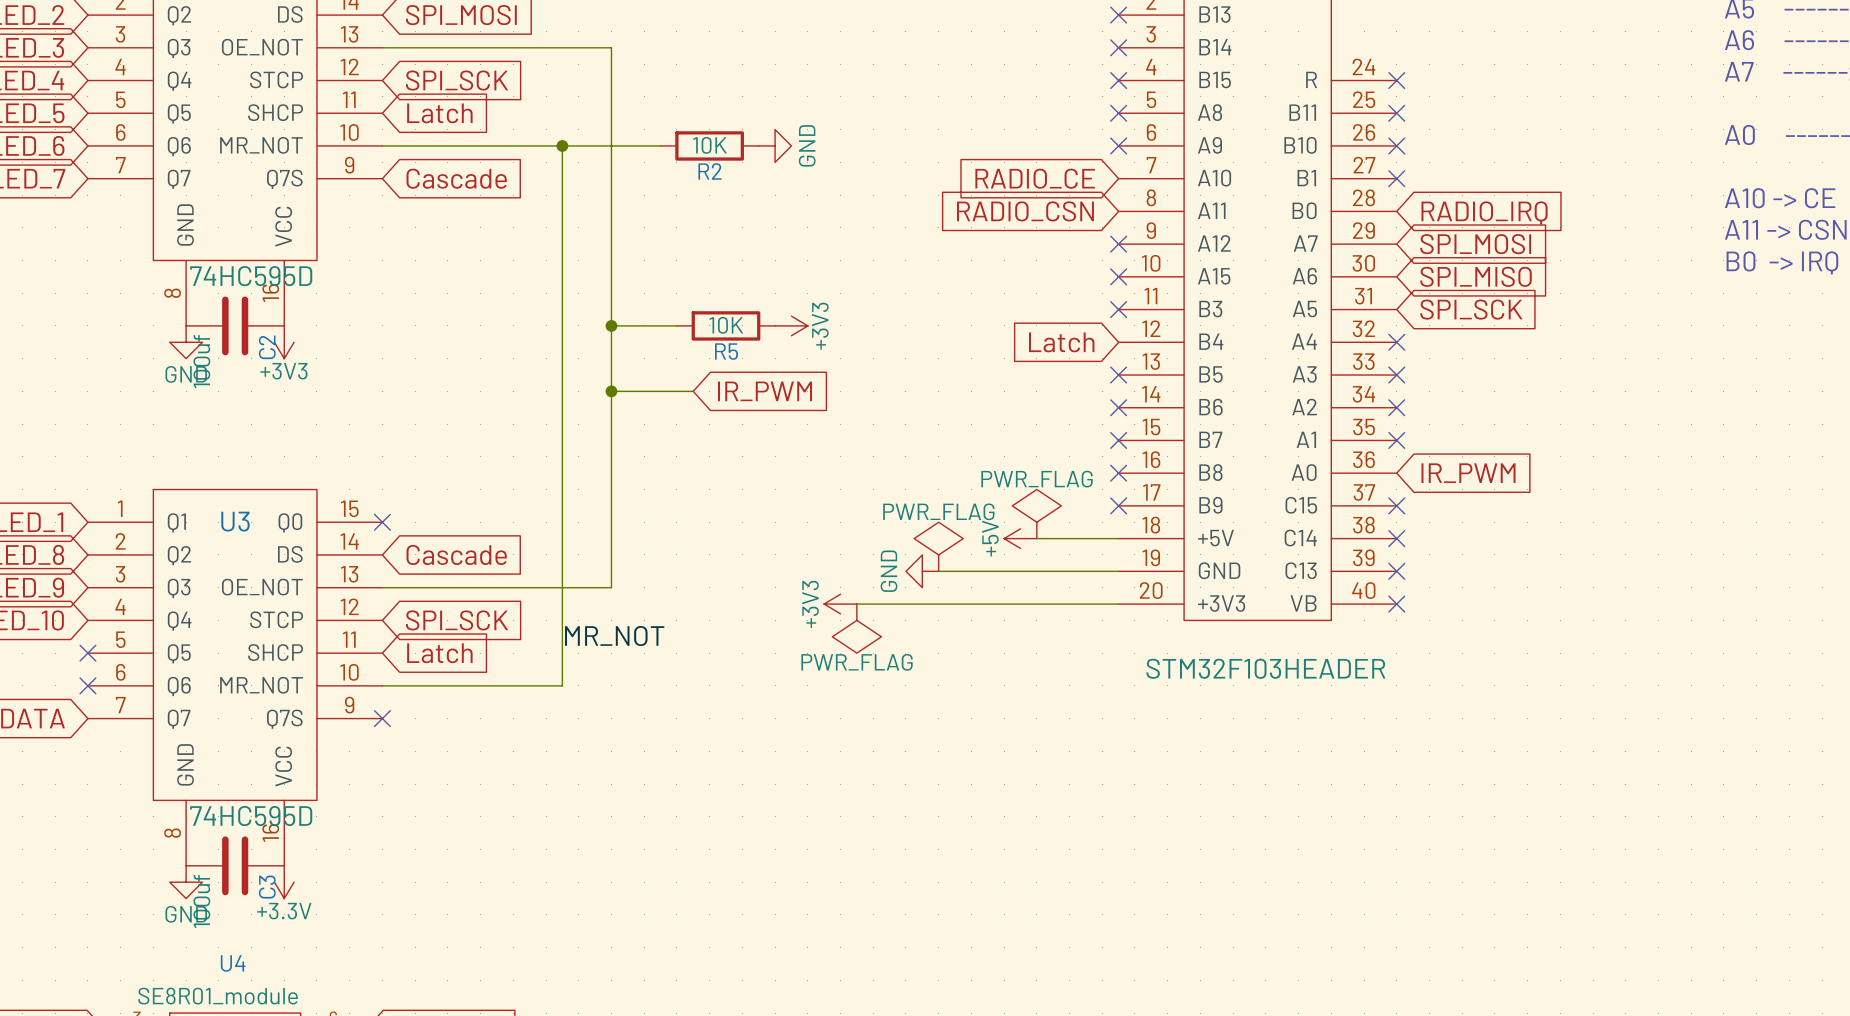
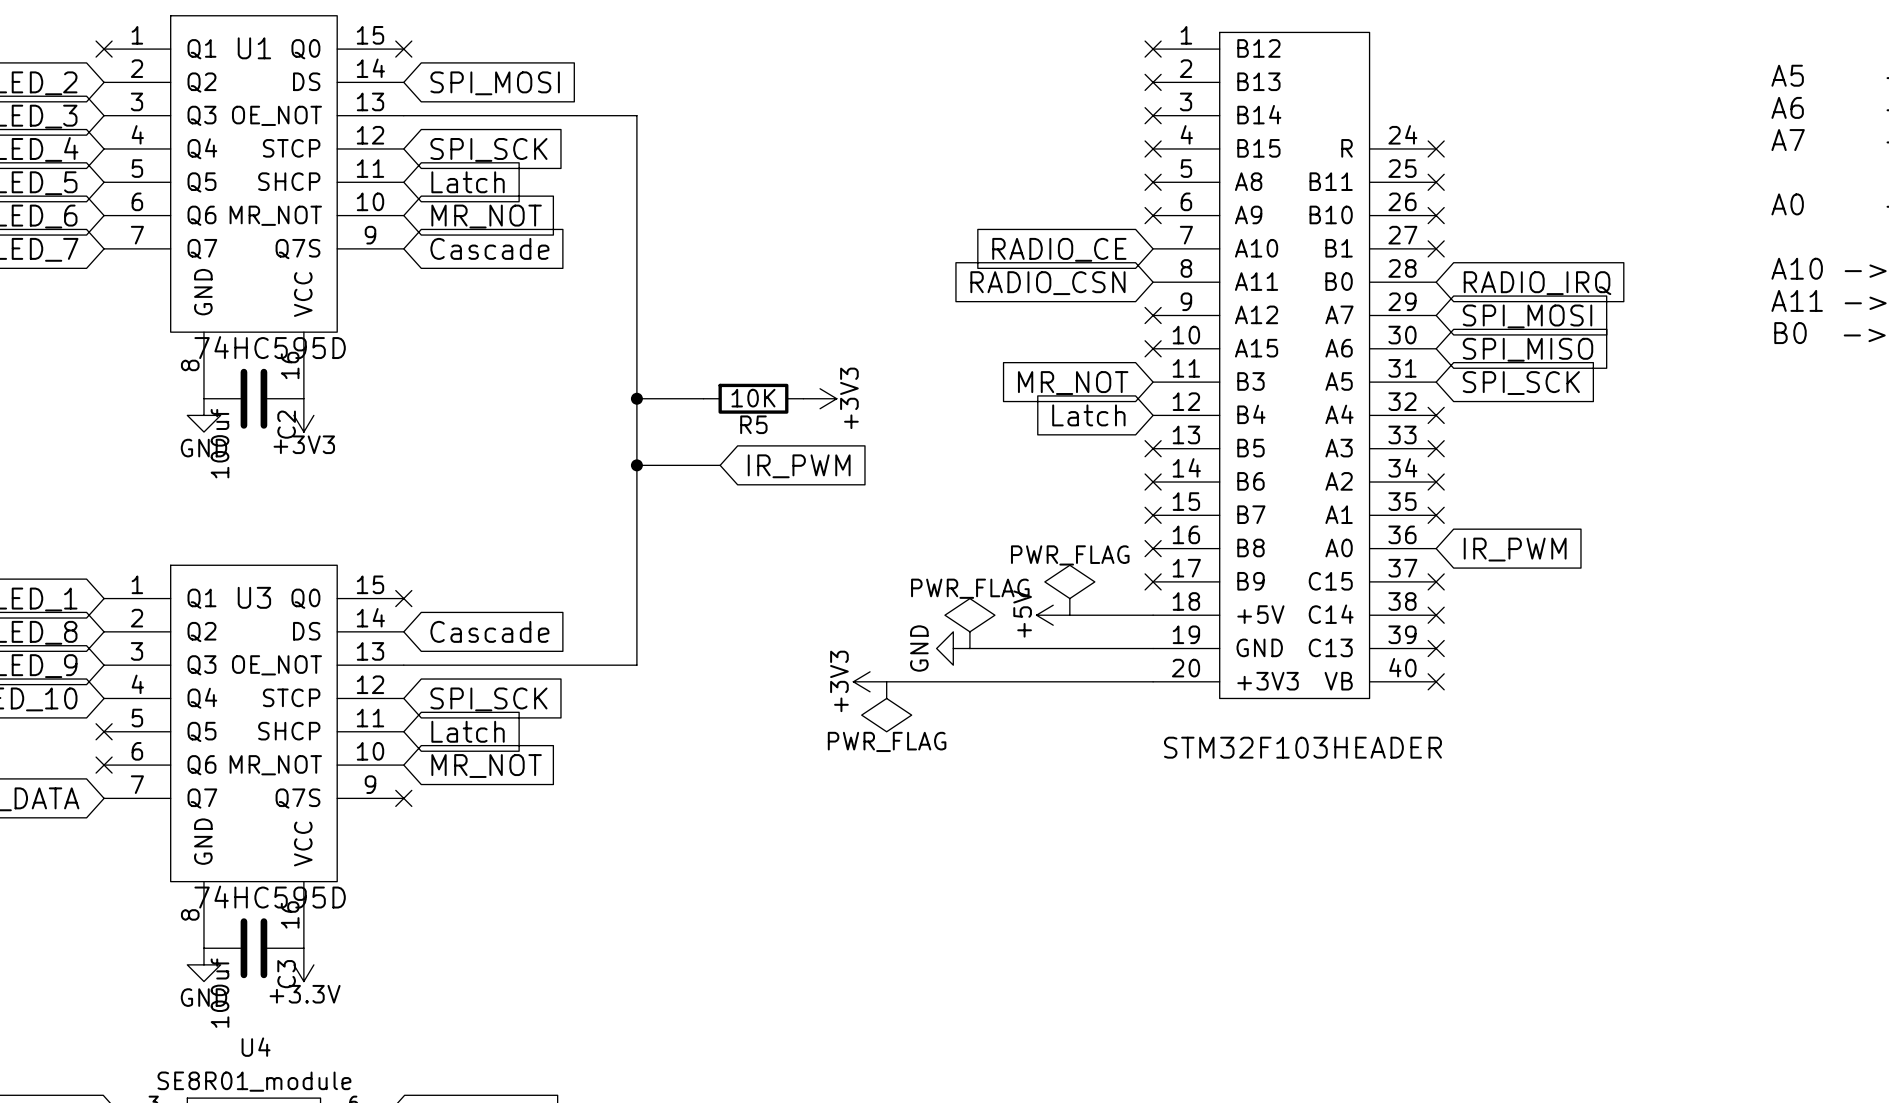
wire: (382, 145) (660, 145) -> none
global label: none -> MR_NOT (486, 216)
wire: (562, 145) (562, 685) (382, 685) -> none
junction: (562, 145) -> none
R2: 10K (709, 145) -> none
power symbol: GND (775, 145) -> none
global label: none -> MR_NOT (1073, 383)
no-connect mark: (1118, 309) -> none
label: MR_NOT (614, 636) -> none
global label: none -> MR_NOT (486, 766)

